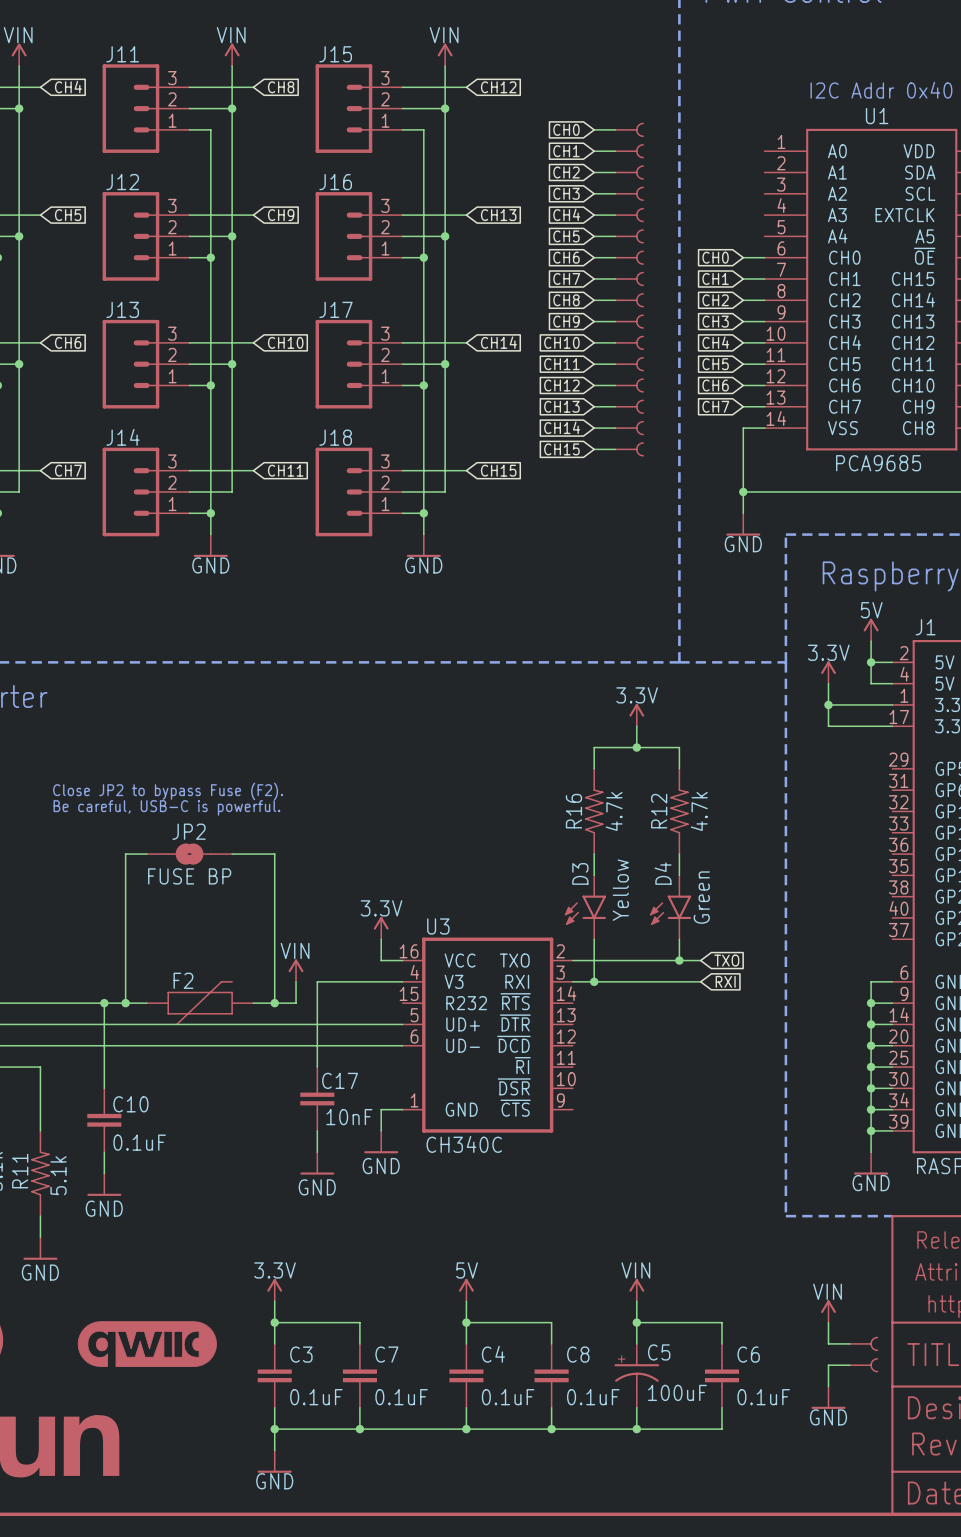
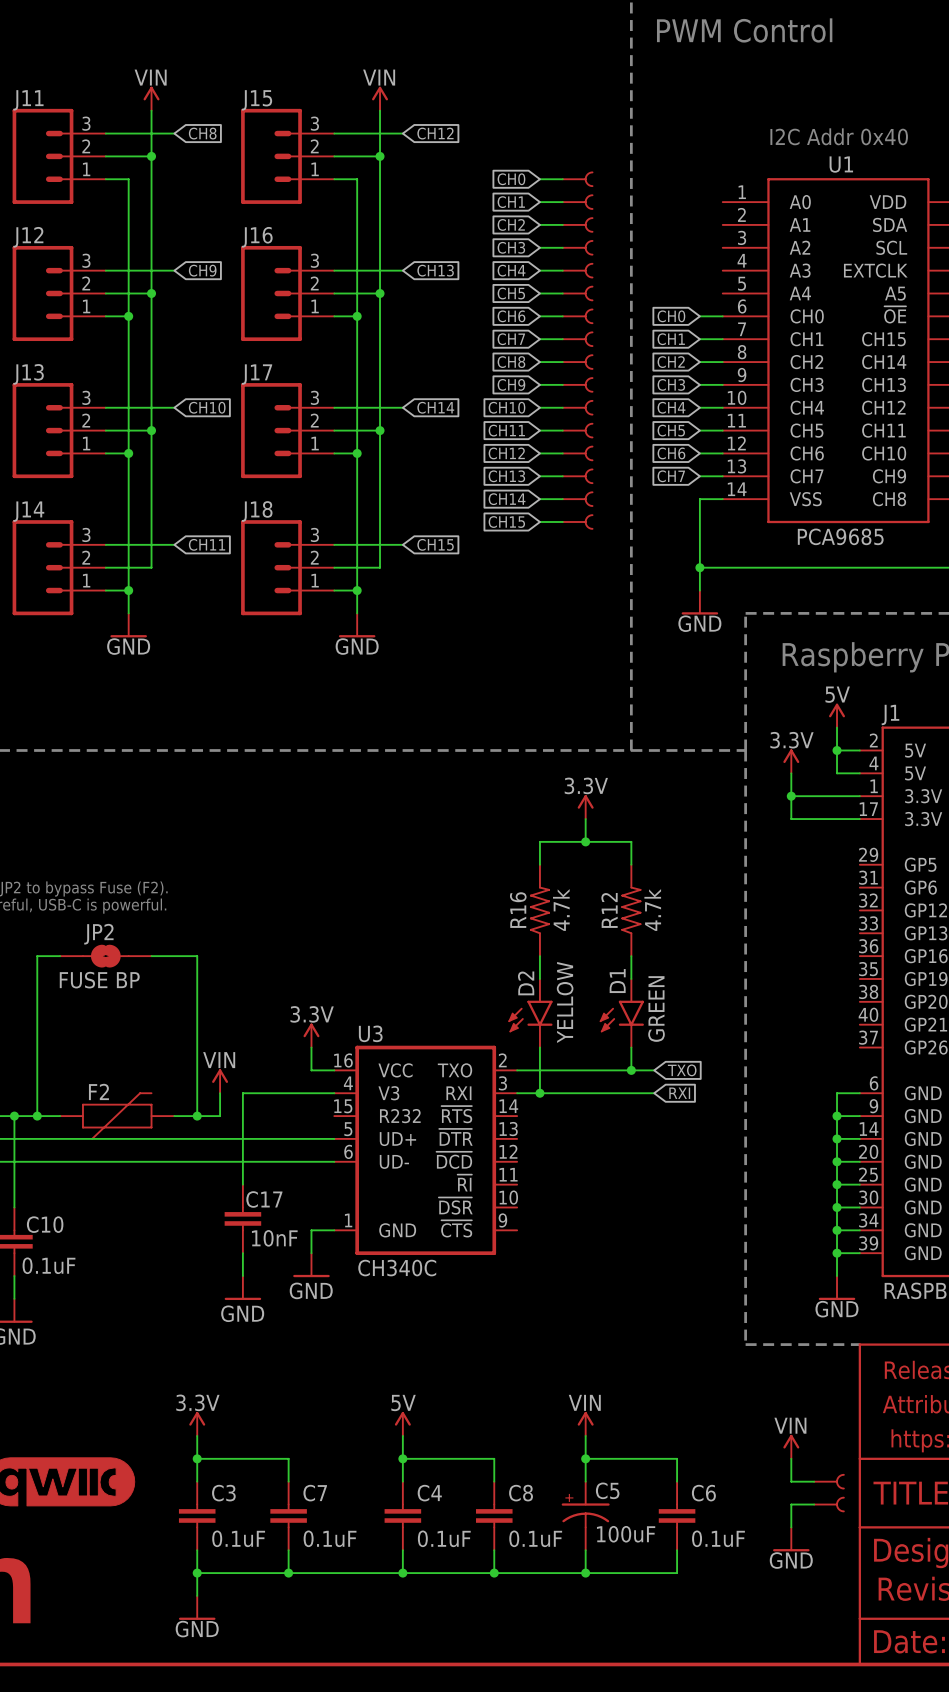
D3 name: D3 (580, 873) -> D2 (526, 983)
D4 name: D4 (663, 873) -> D1 (617, 981)
D3 value: Yellow (620, 890) -> YELLOW (565, 1002)
text: Green (701, 897) -> none
D4 value: none -> GREEN (656, 1009)

